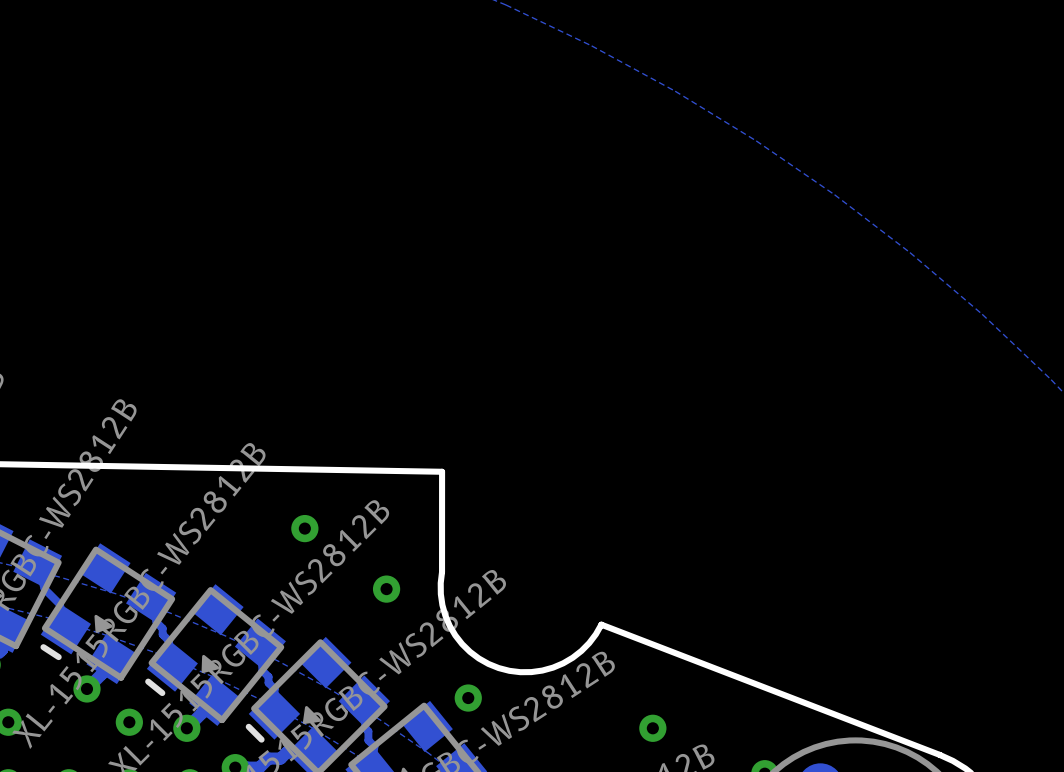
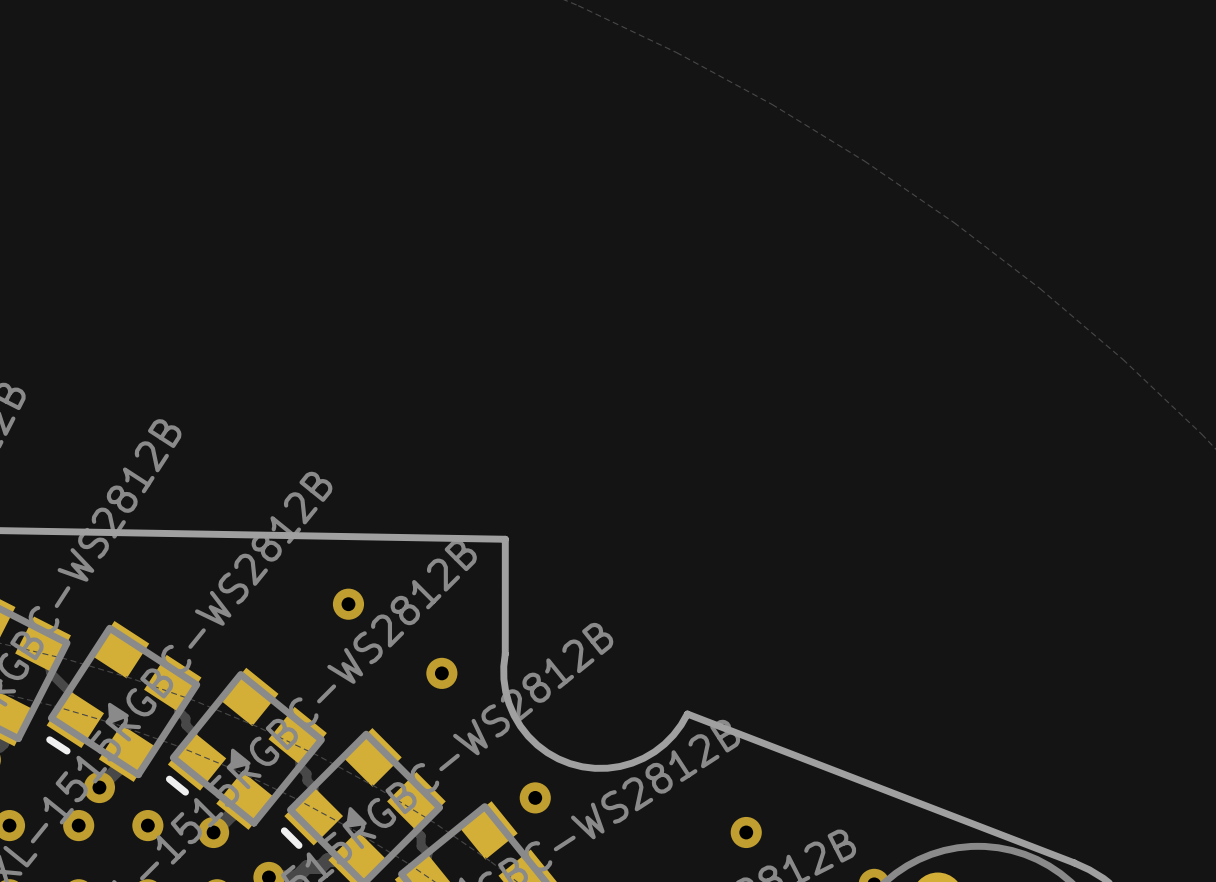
via: none -> (78, 825)

